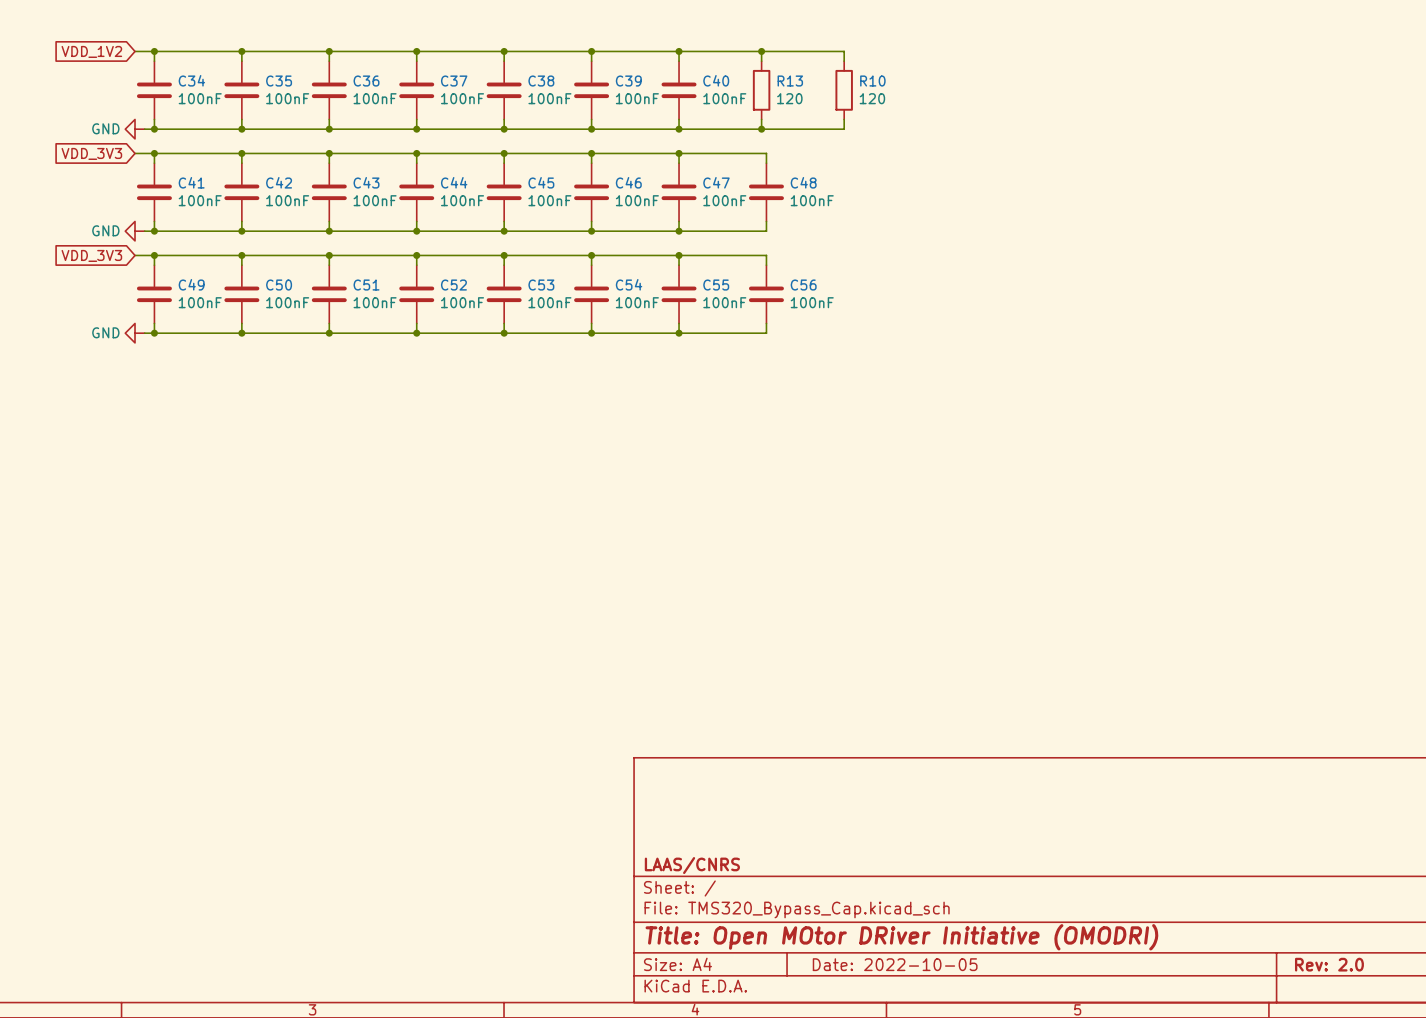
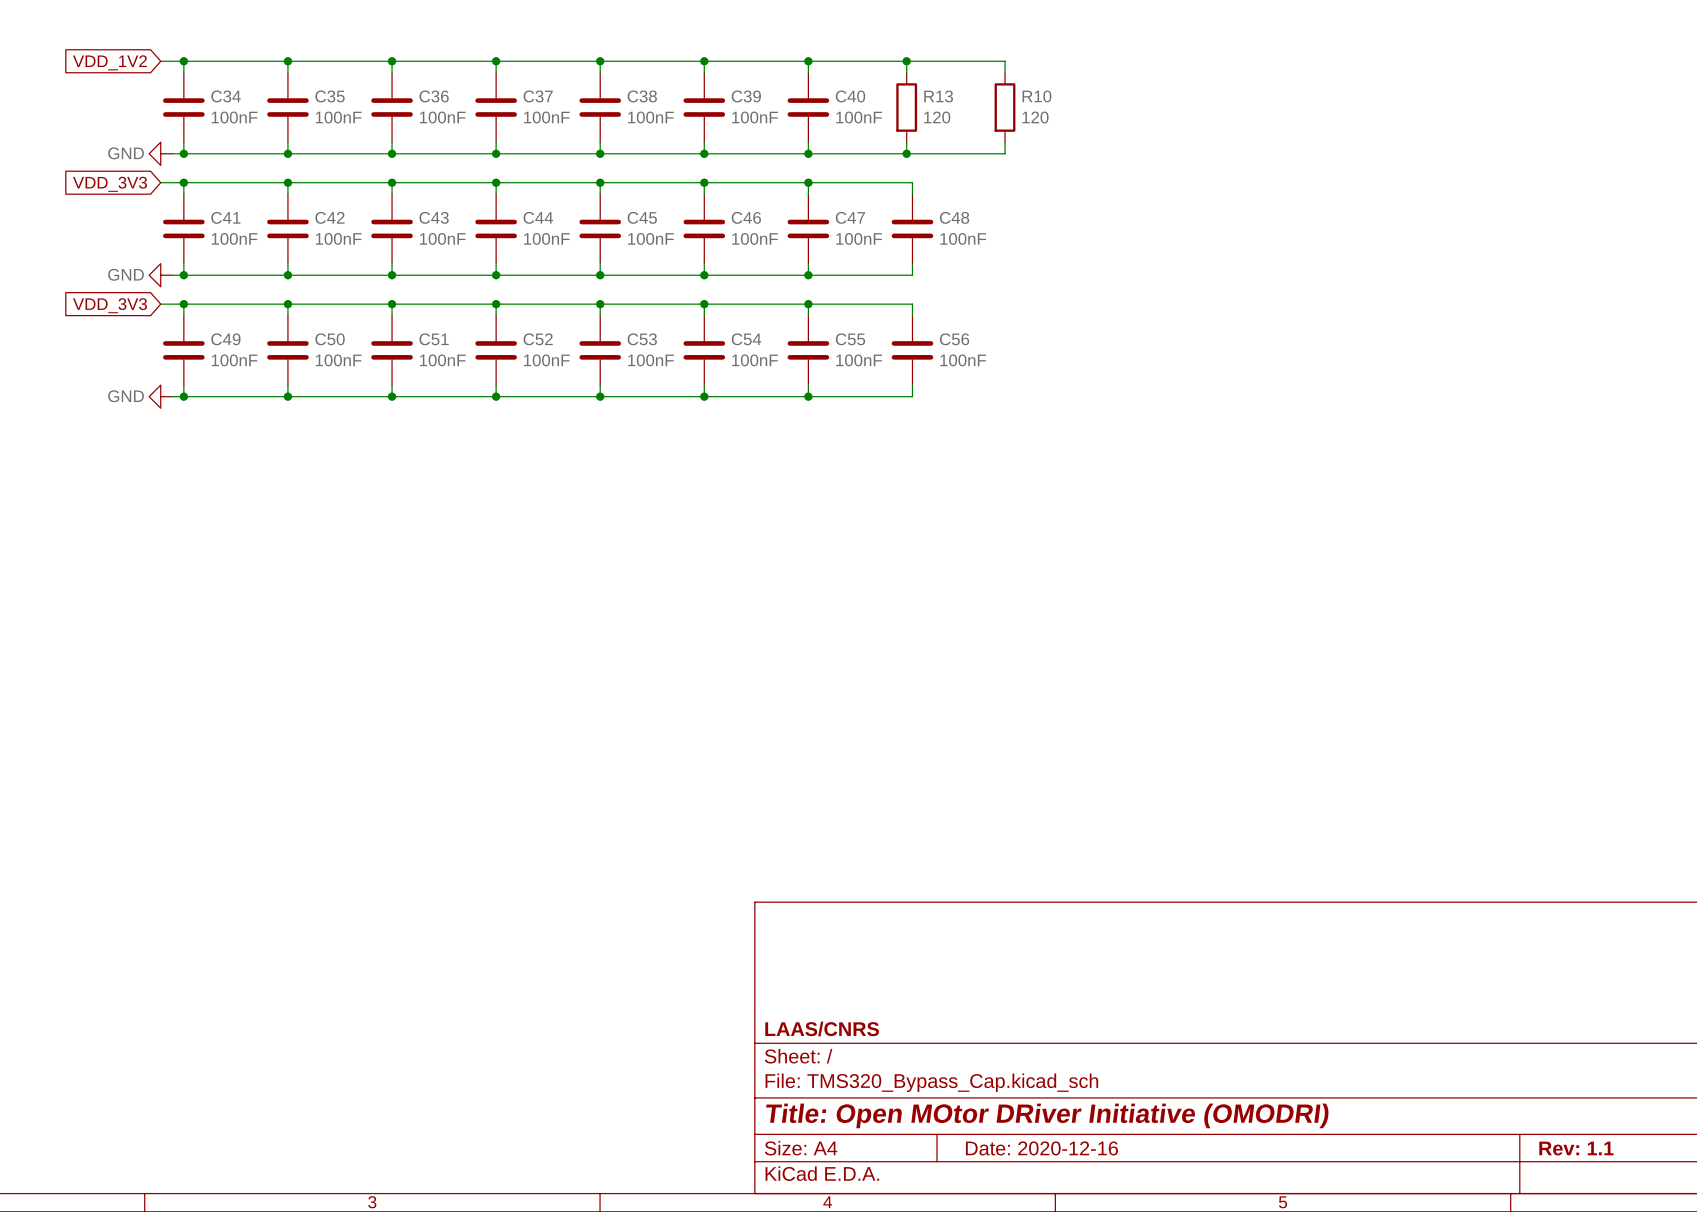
title block: Date: 2022-10-05 (895, 964) -> Date: 2020-12-16 (1041, 1148)
title block: Rev: 2.0 (1329, 964) -> Rev: 1.1 (1576, 1148)

